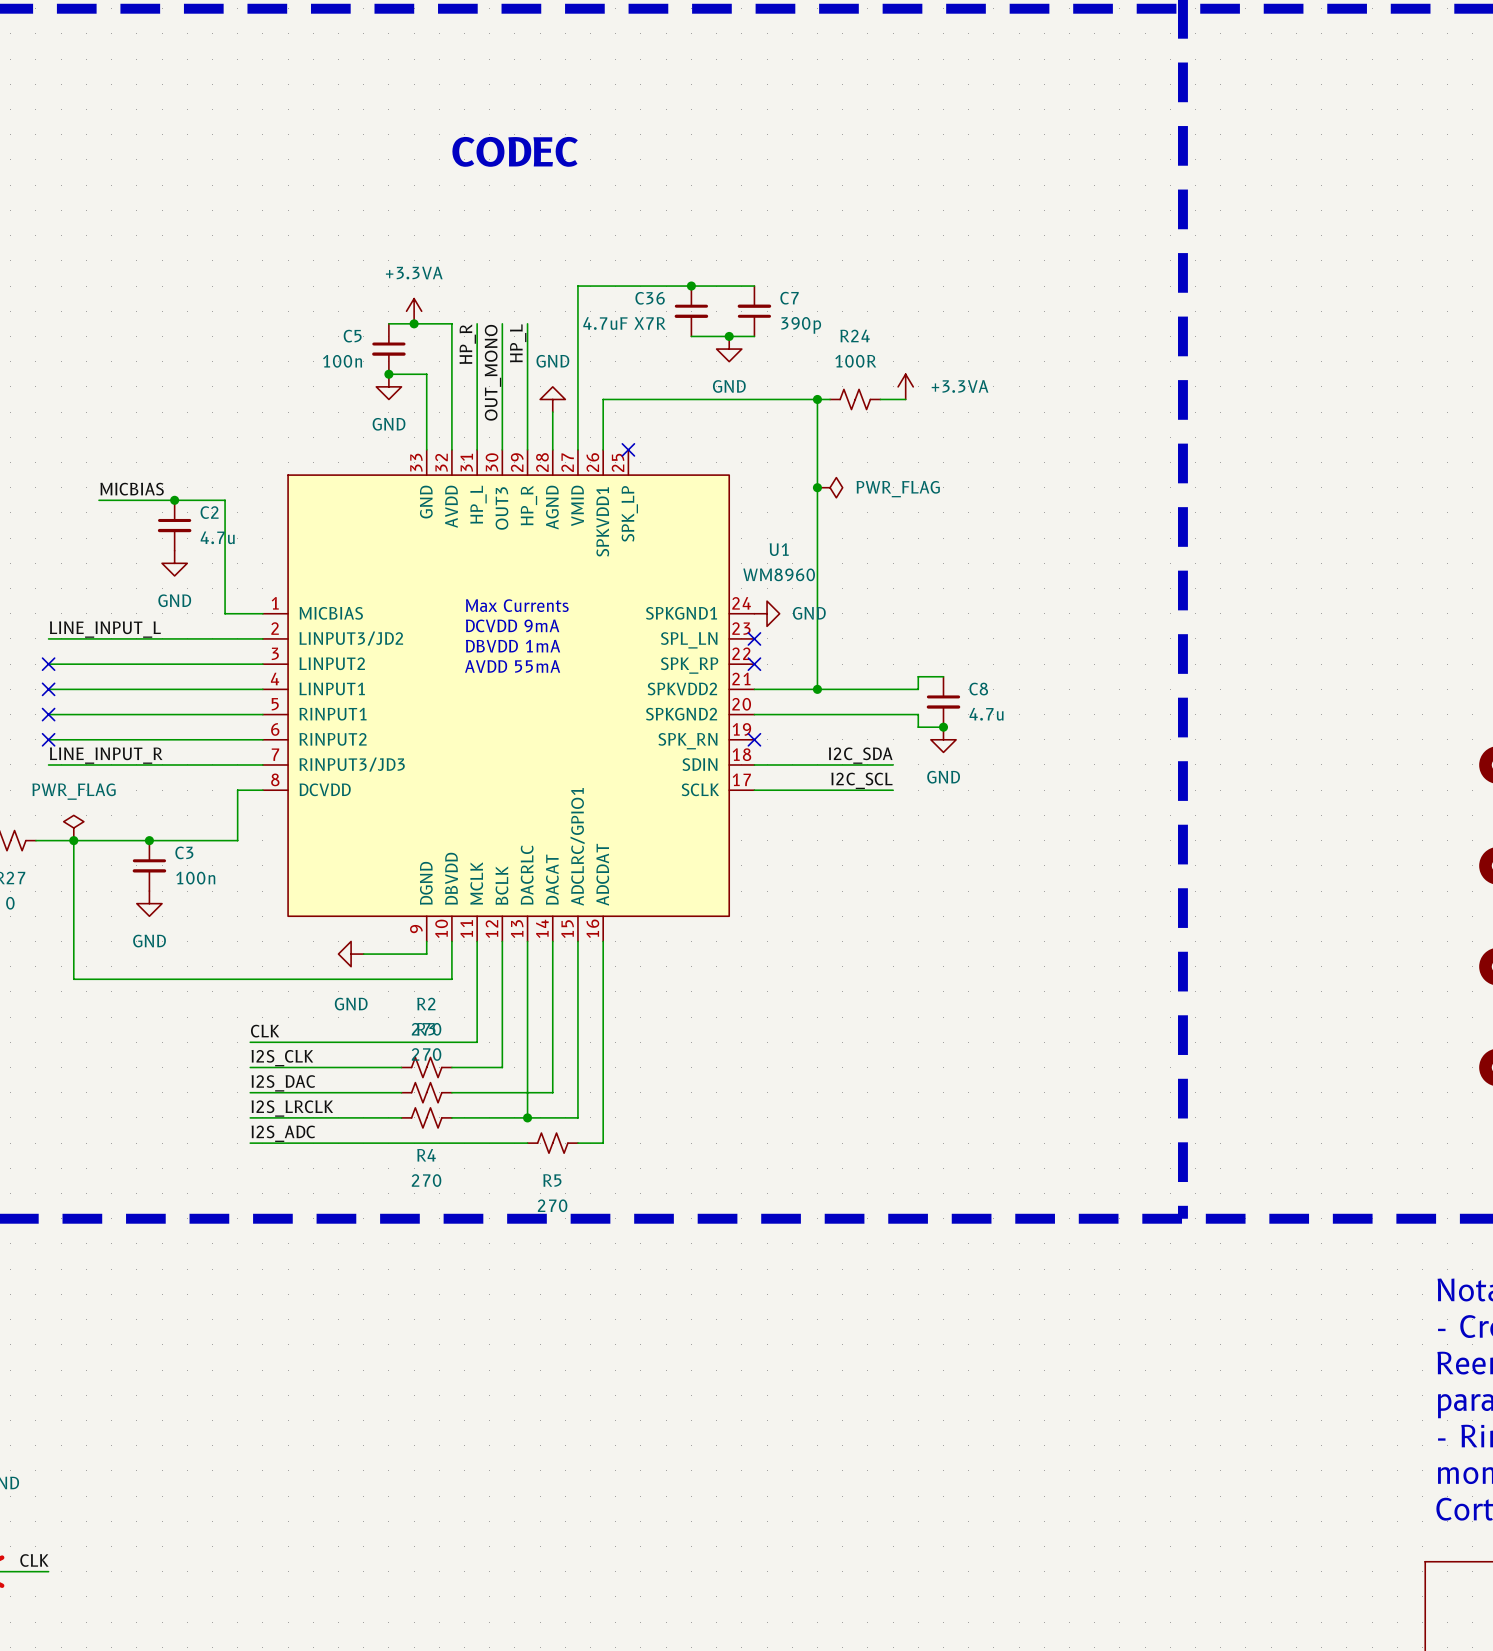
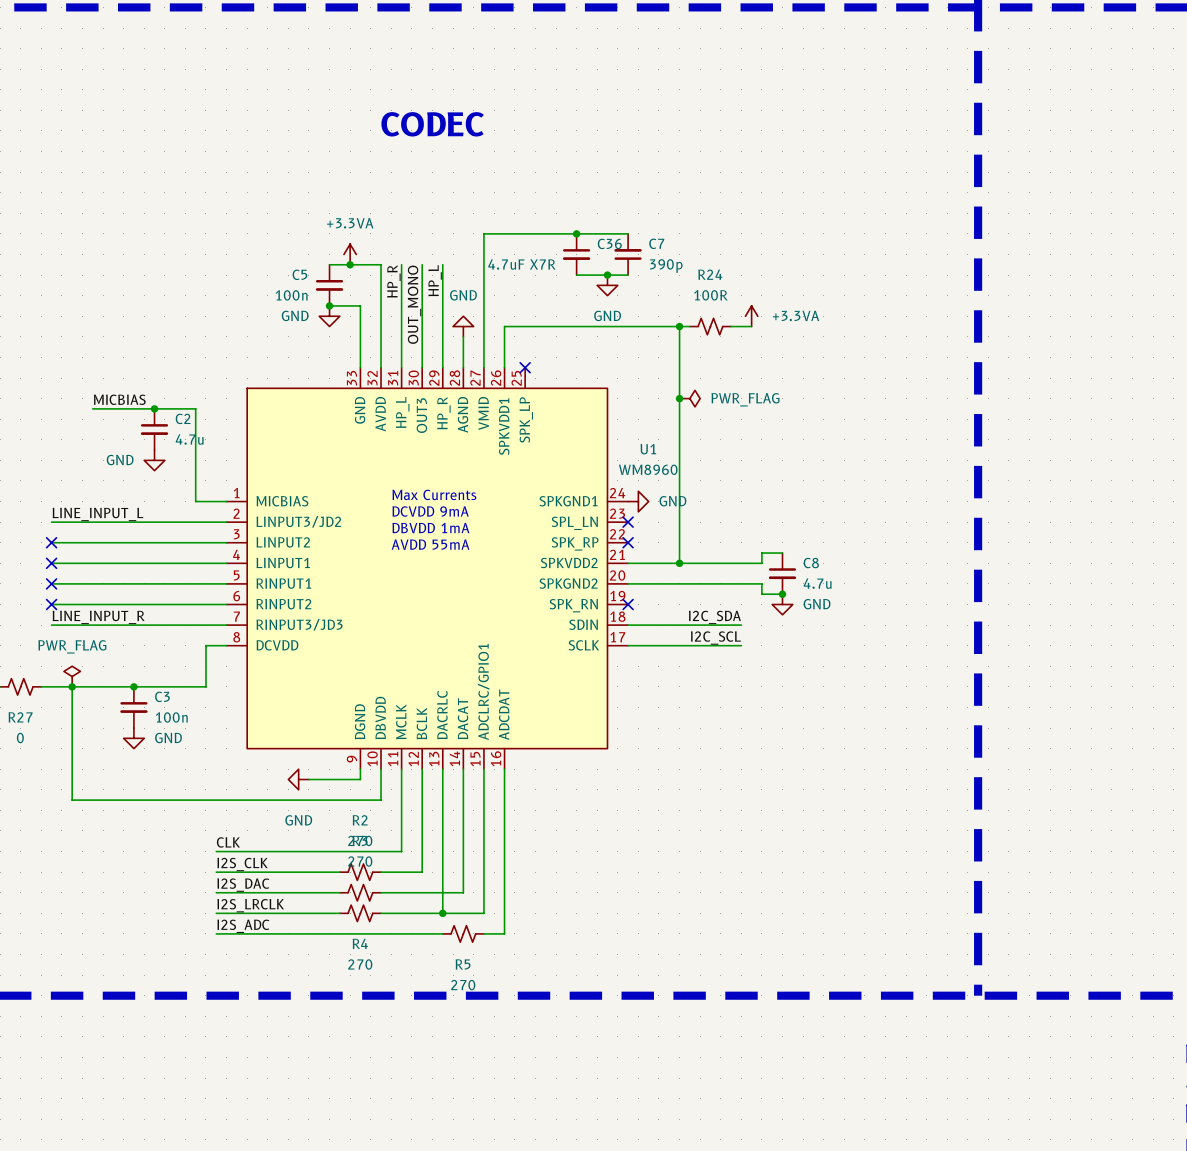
C36 name position: C36 (650, 298) -> C36 (609, 243)
power symbol text position: GND (389, 424) -> GND (295, 315)
power symbol text position: GND (174, 600) -> GND (120, 460)
power symbol text position: GND (943, 777) -> GND (817, 604)
power symbol text position: GND (149, 941) -> GND (168, 738)

